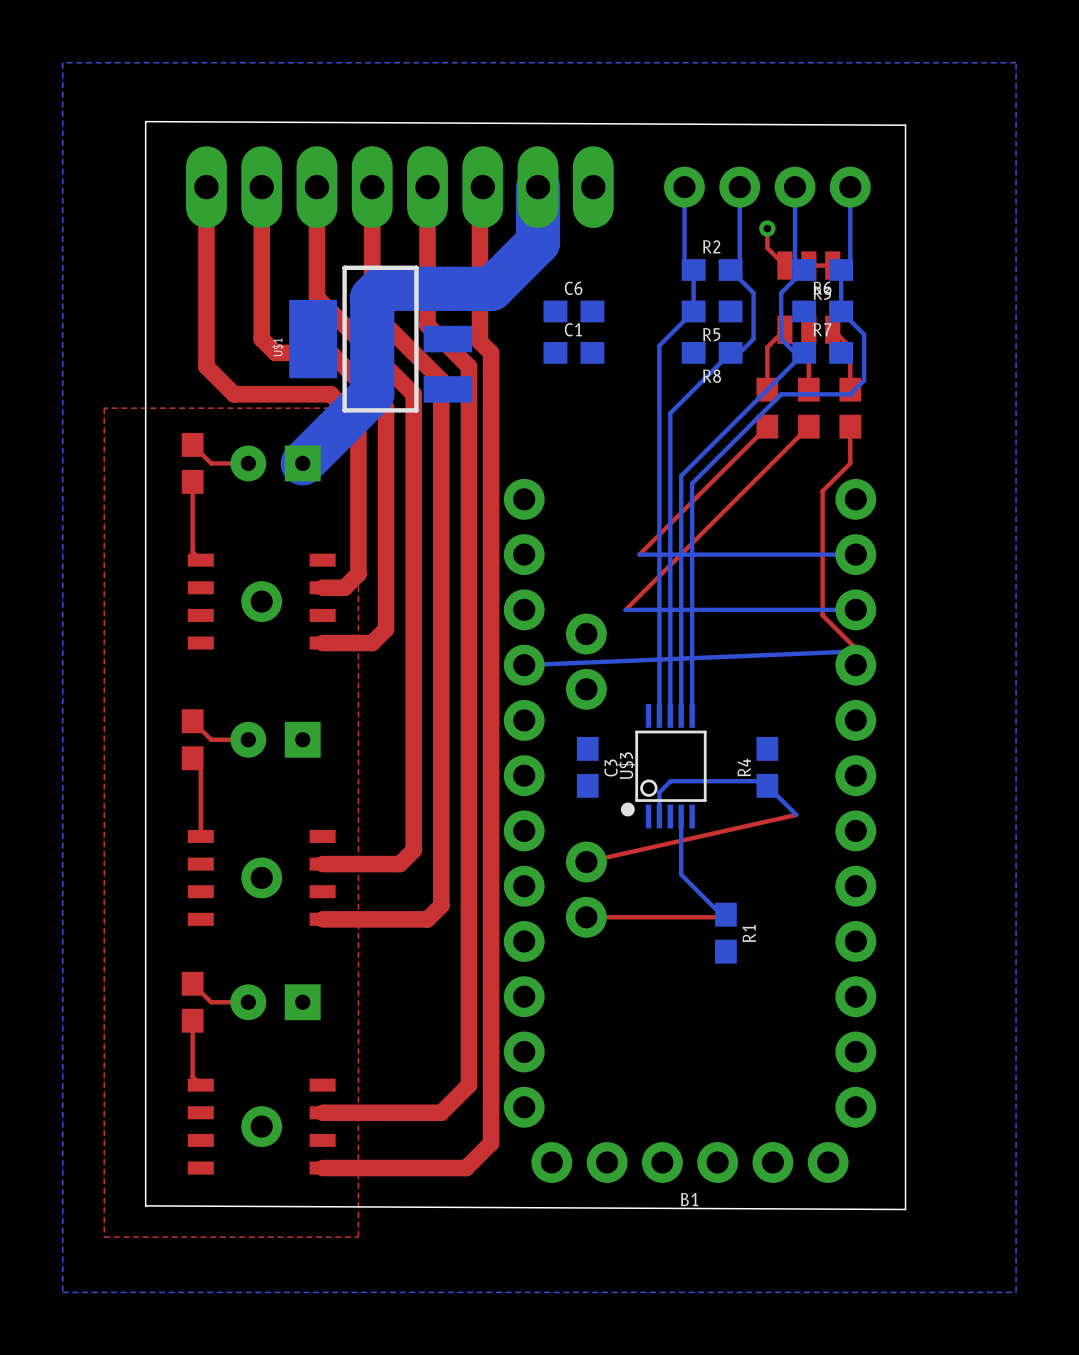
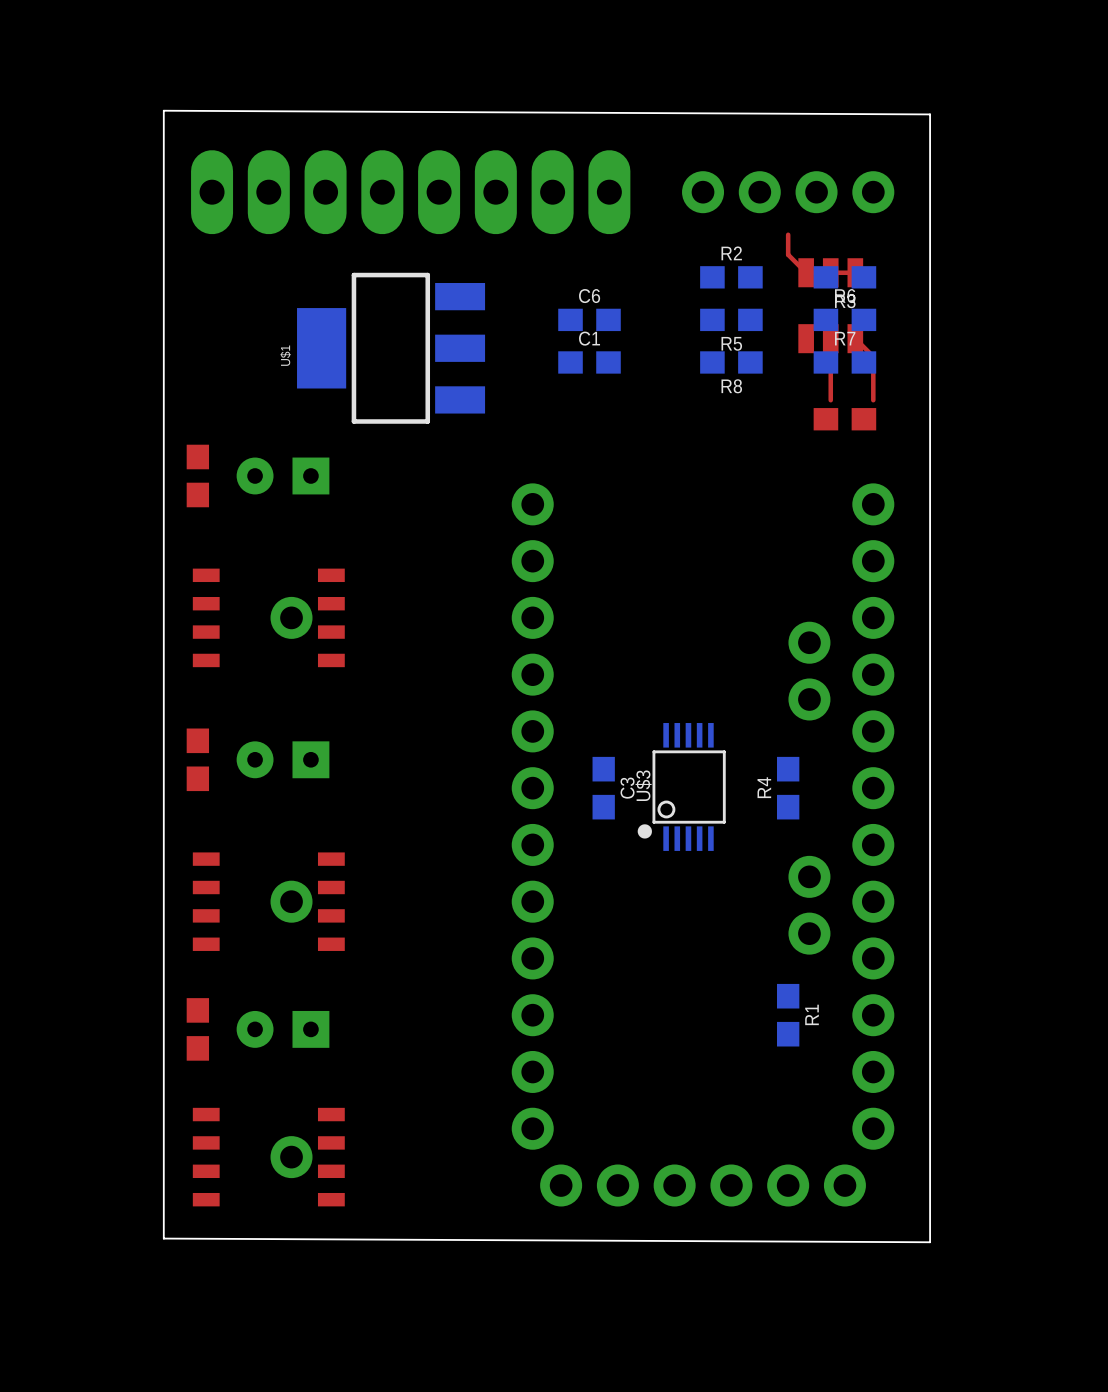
bottom zone outline: (1016, 62) (62, 62) (62, 1292) (1016, 1292) (1016, 62) -> none
board edge: (905, 125) (145, 121) (145, 1205) (159, 1205) -> (930, 128) (930, 114) (163, 110) (163, 1238)
top track: (206, 187) (206, 366) (234, 394) (330, 394) (358, 421) (358, 573) (344, 587) (322, 587) -> none
top track: (261, 187) (261, 339) (275, 352) (330, 352) (386, 408) (386, 629) (372, 643) (322, 643) -> none
top track: (316, 187) (316, 297) (413, 394) (413, 850) (399, 864) (322, 864) -> none
top track: (372, 187) (372, 311) (441, 380) (441, 905) (427, 919) (322, 919) -> none
top track: (427, 187) (427, 325) (468, 366) (468, 1085) (441, 1112) (322, 1112) -> none
top track: (482, 187) (480, 189) (480, 341) (491, 352) (491, 1143) (466, 1168) (322, 1168) -> none
bottom track: (538, 187) (538, 242) (491, 288) (381, 288) (372, 297) (372, 393) (302, 463) -> none
bottom track: (684, 187) (684, 260) (693, 270) (693, 311) (659, 345) (659, 715) -> none
bottom track: (739, 187) (739, 260) (730, 270) (753, 292) (753, 339) (739, 352) (730, 352) (670, 413) (670, 715) -> none
bottom track: (795, 187) (795, 260) (804, 270) (781, 292) (781, 339) (795, 352) (804, 352) (681, 475) (681, 715) -> none
bottom track: (850, 187) (850, 260) (841, 270) (841, 311) (864, 334) (864, 380) (850, 394) (781, 394) (692, 483) (692, 715) -> none
via: (767, 228) -> none
top track: (784, 329) (767, 347) (767, 389) -> none
top zone outline: (358, 408) (104, 408) (104, 1237) (358, 1237) (358, 408) -> none
part: (767, 408) -> none
part: (808, 408) -> none
part: none -> (844, 419)
part: (850, 408) -> none
top track: (767, 426) (639, 554) -> none
top track: (808, 426) (625, 609) -> none
top track: (850, 426) (850, 463) (822, 491) (822, 615) (858, 651) -> none
top track: (192, 444) (211, 463) (248, 463) -> none
top track: (192, 481) (192, 551) (200, 560) -> none
bottom track: (855, 554) (639, 554) -> none
part position: (261, 601) -> (291, 617)
bottom track: (855, 609) (625, 609) -> none
bottom track: (858, 651) (524, 665) -> none
top track: (192, 721) (211, 739) (248, 739) -> none
top track: (192, 758) (200, 766) (200, 836) -> none
top track: (796, 814) (586, 862) -> none
bottom track: (796, 814) (762, 781) (670, 781) (659, 792) (659, 816) -> none
bottom track: (681, 816) (681, 874) (723, 917) -> none
B1 side: bottom (690, 830) -> top (703, 844)
part position: (261, 877) -> (291, 901)
top track: (723, 917) (586, 917) -> none
R1 position: (725, 933) -> (788, 1015)
top track: (192, 983) (211, 1002) (248, 1002) -> none
top track: (192, 1020) (192, 1076) (200, 1085) -> none
part position: (261, 1126) -> (291, 1157)

